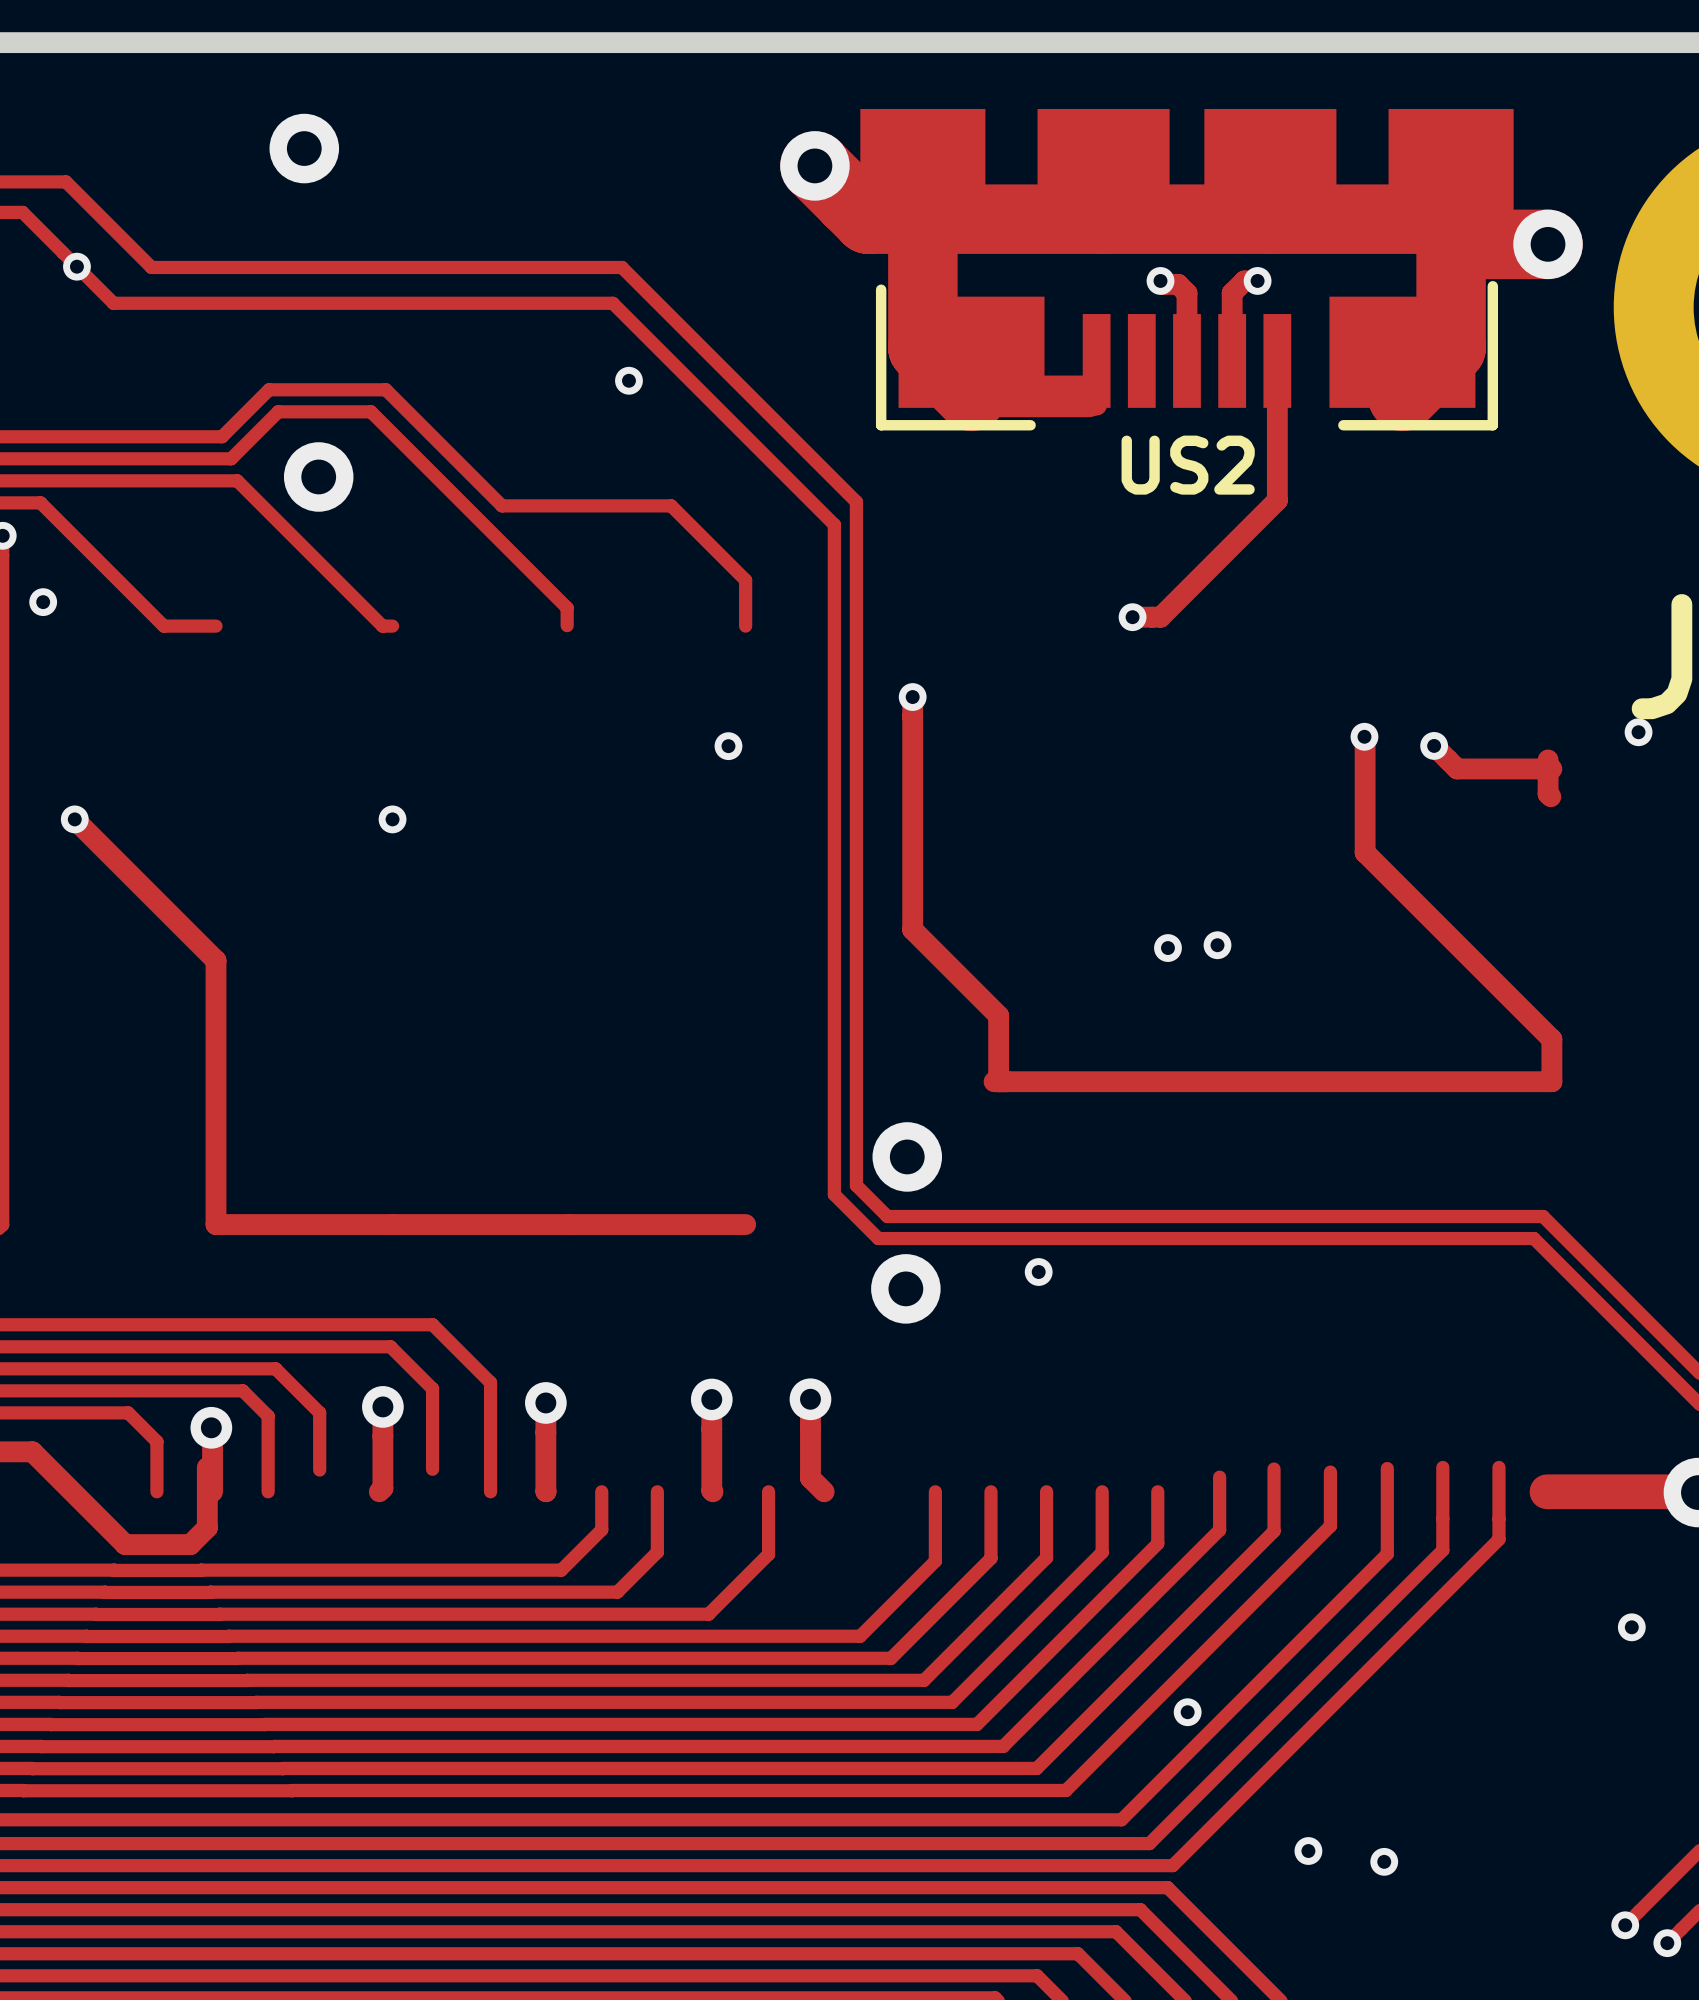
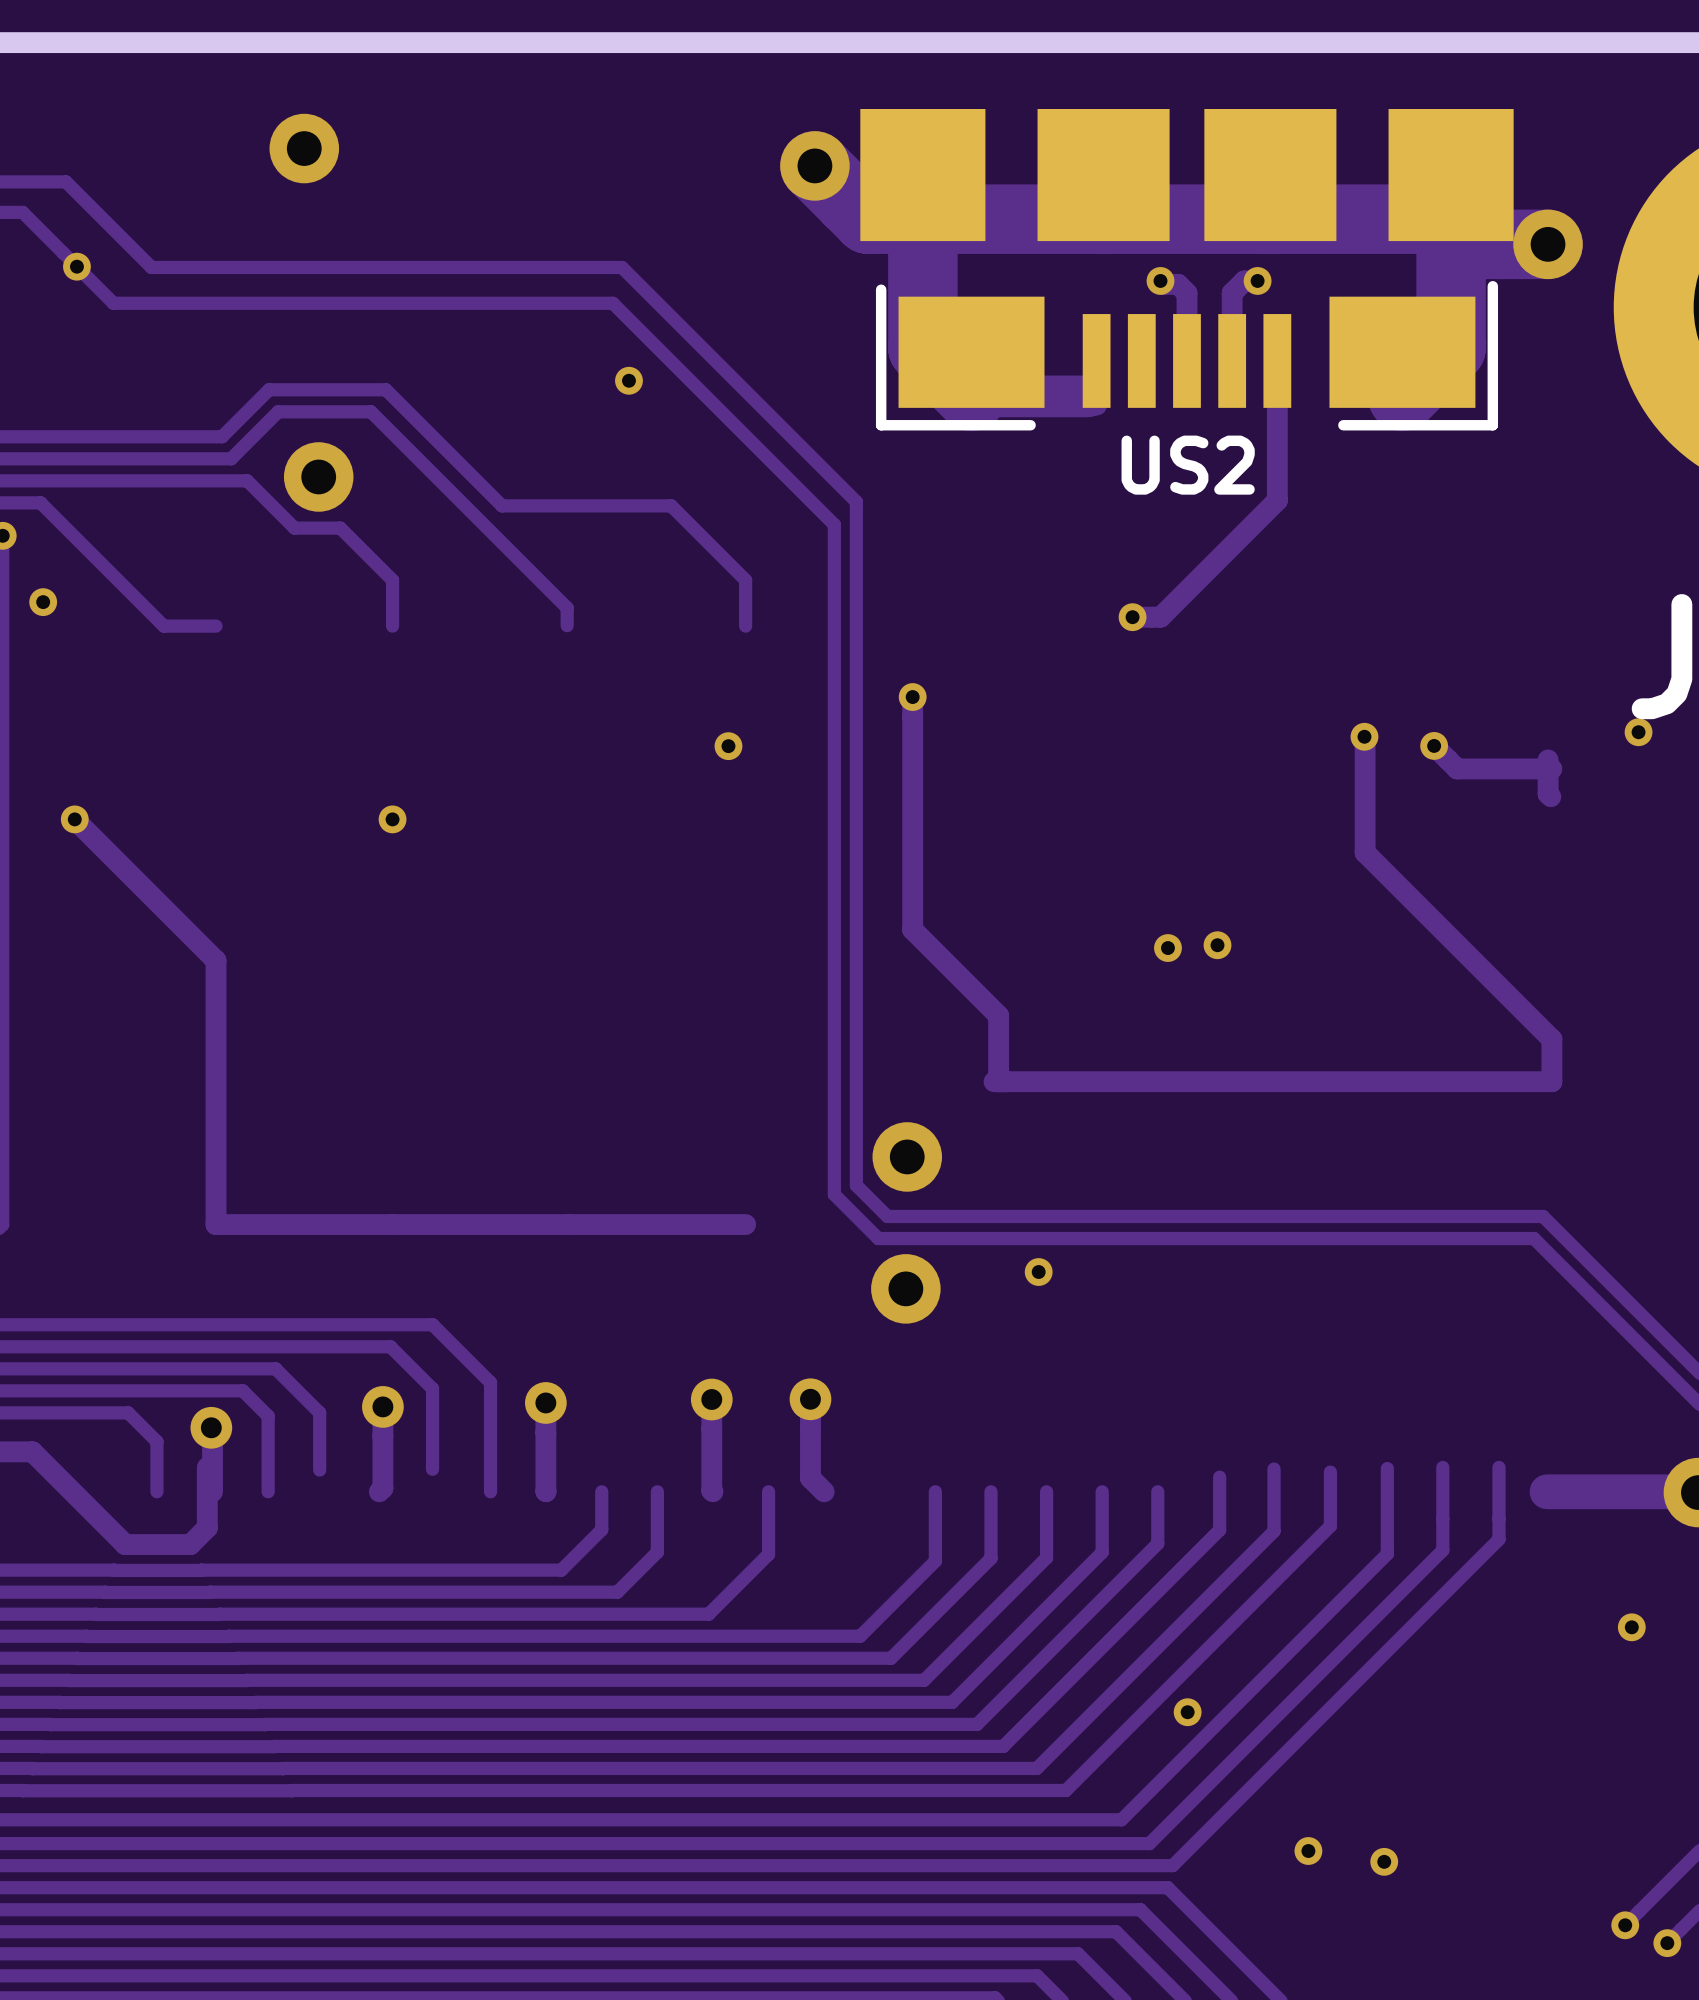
track: (237, 480) (382, 626) (392, 626) -> (237, 480) (247, 480) (294, 528) (340, 528) (392, 580) (392, 626)

